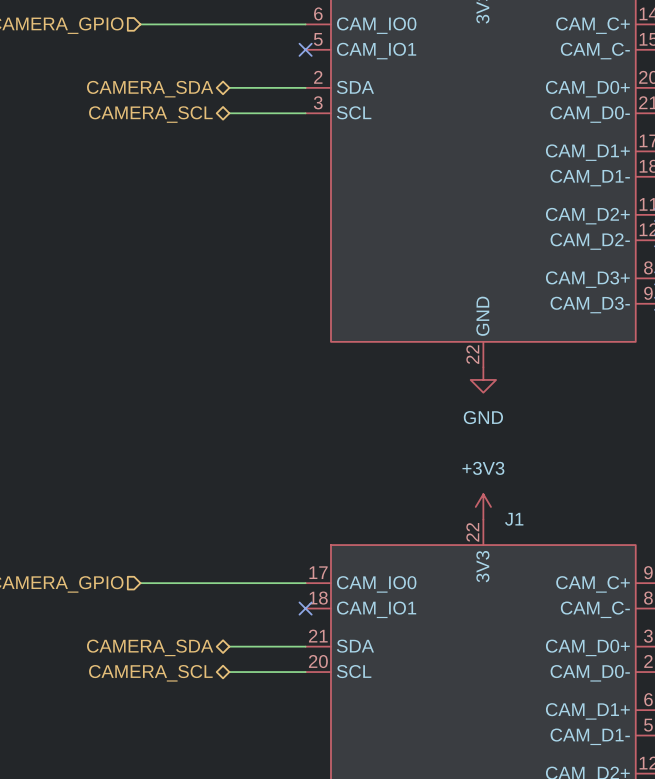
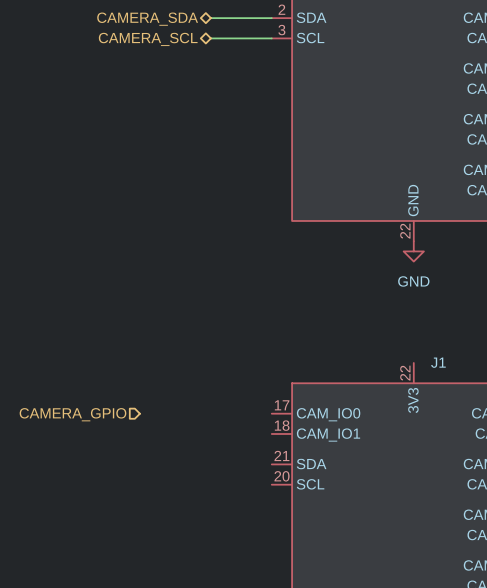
power symbol: +3V3 (483, 506) -> none
wire: (140, 583) (305, 583) -> none
no-connect mark: (305, 608) -> none
wire: (229, 646) (305, 646) -> none
hierarchical label: CAMERA_SDA (150, 647) -> none
wire: (229, 672) (305, 672) -> none
hierarchical label: CAMERA_SCL (150, 673) -> none

